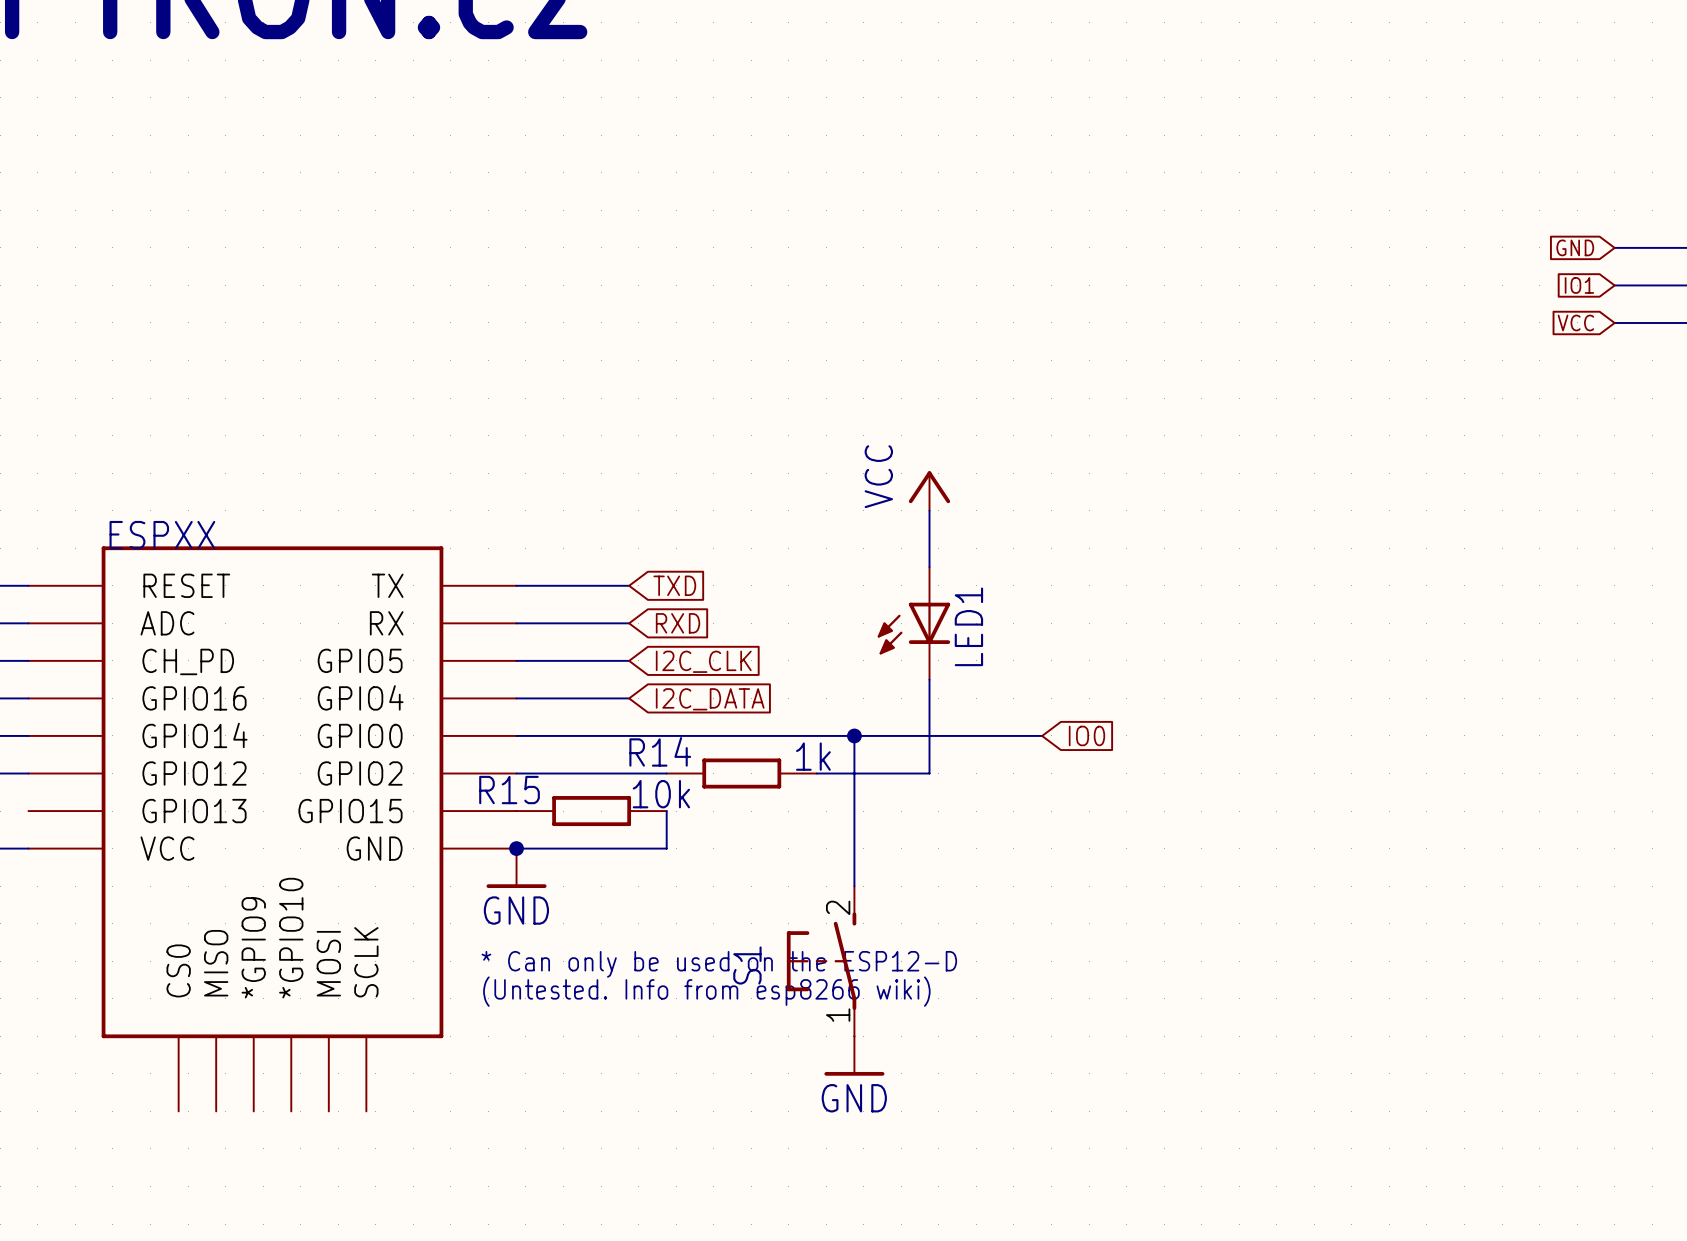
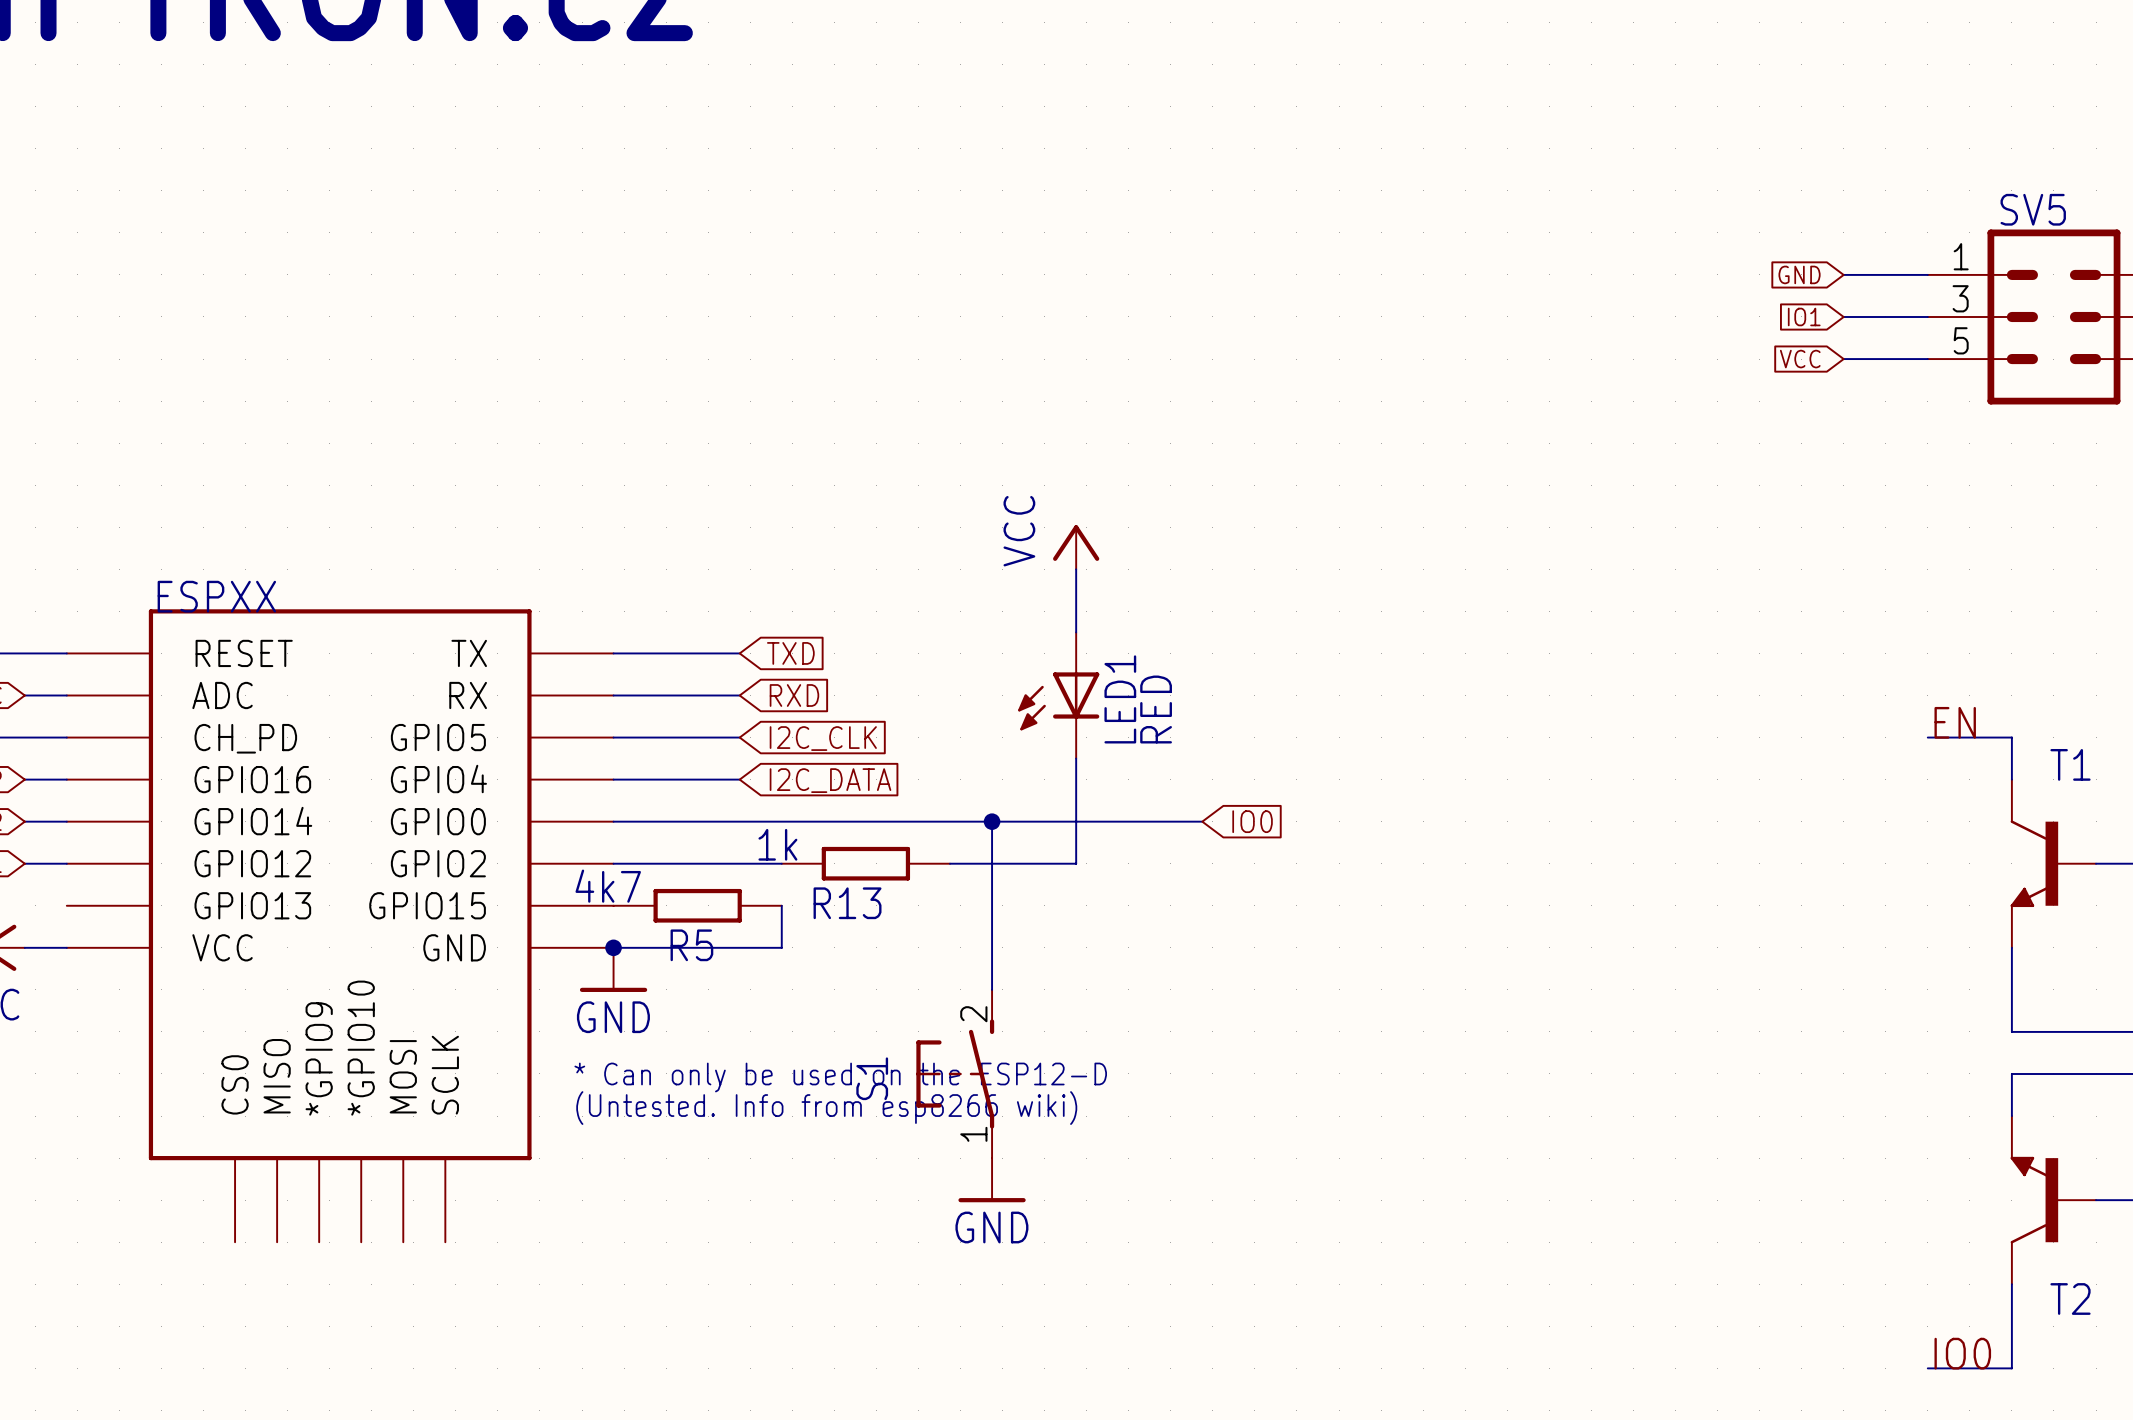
LED1 value: none -> RED (1156, 709)
R14 name: R14 (660, 751) -> R13 (847, 903)
R14 value position: 1k (813, 756) -> 1k (777, 844)
R15 name: R15 (509, 790) -> R5 (691, 945)
R15 value: 10k (661, 794) -> 4k7 (608, 886)

